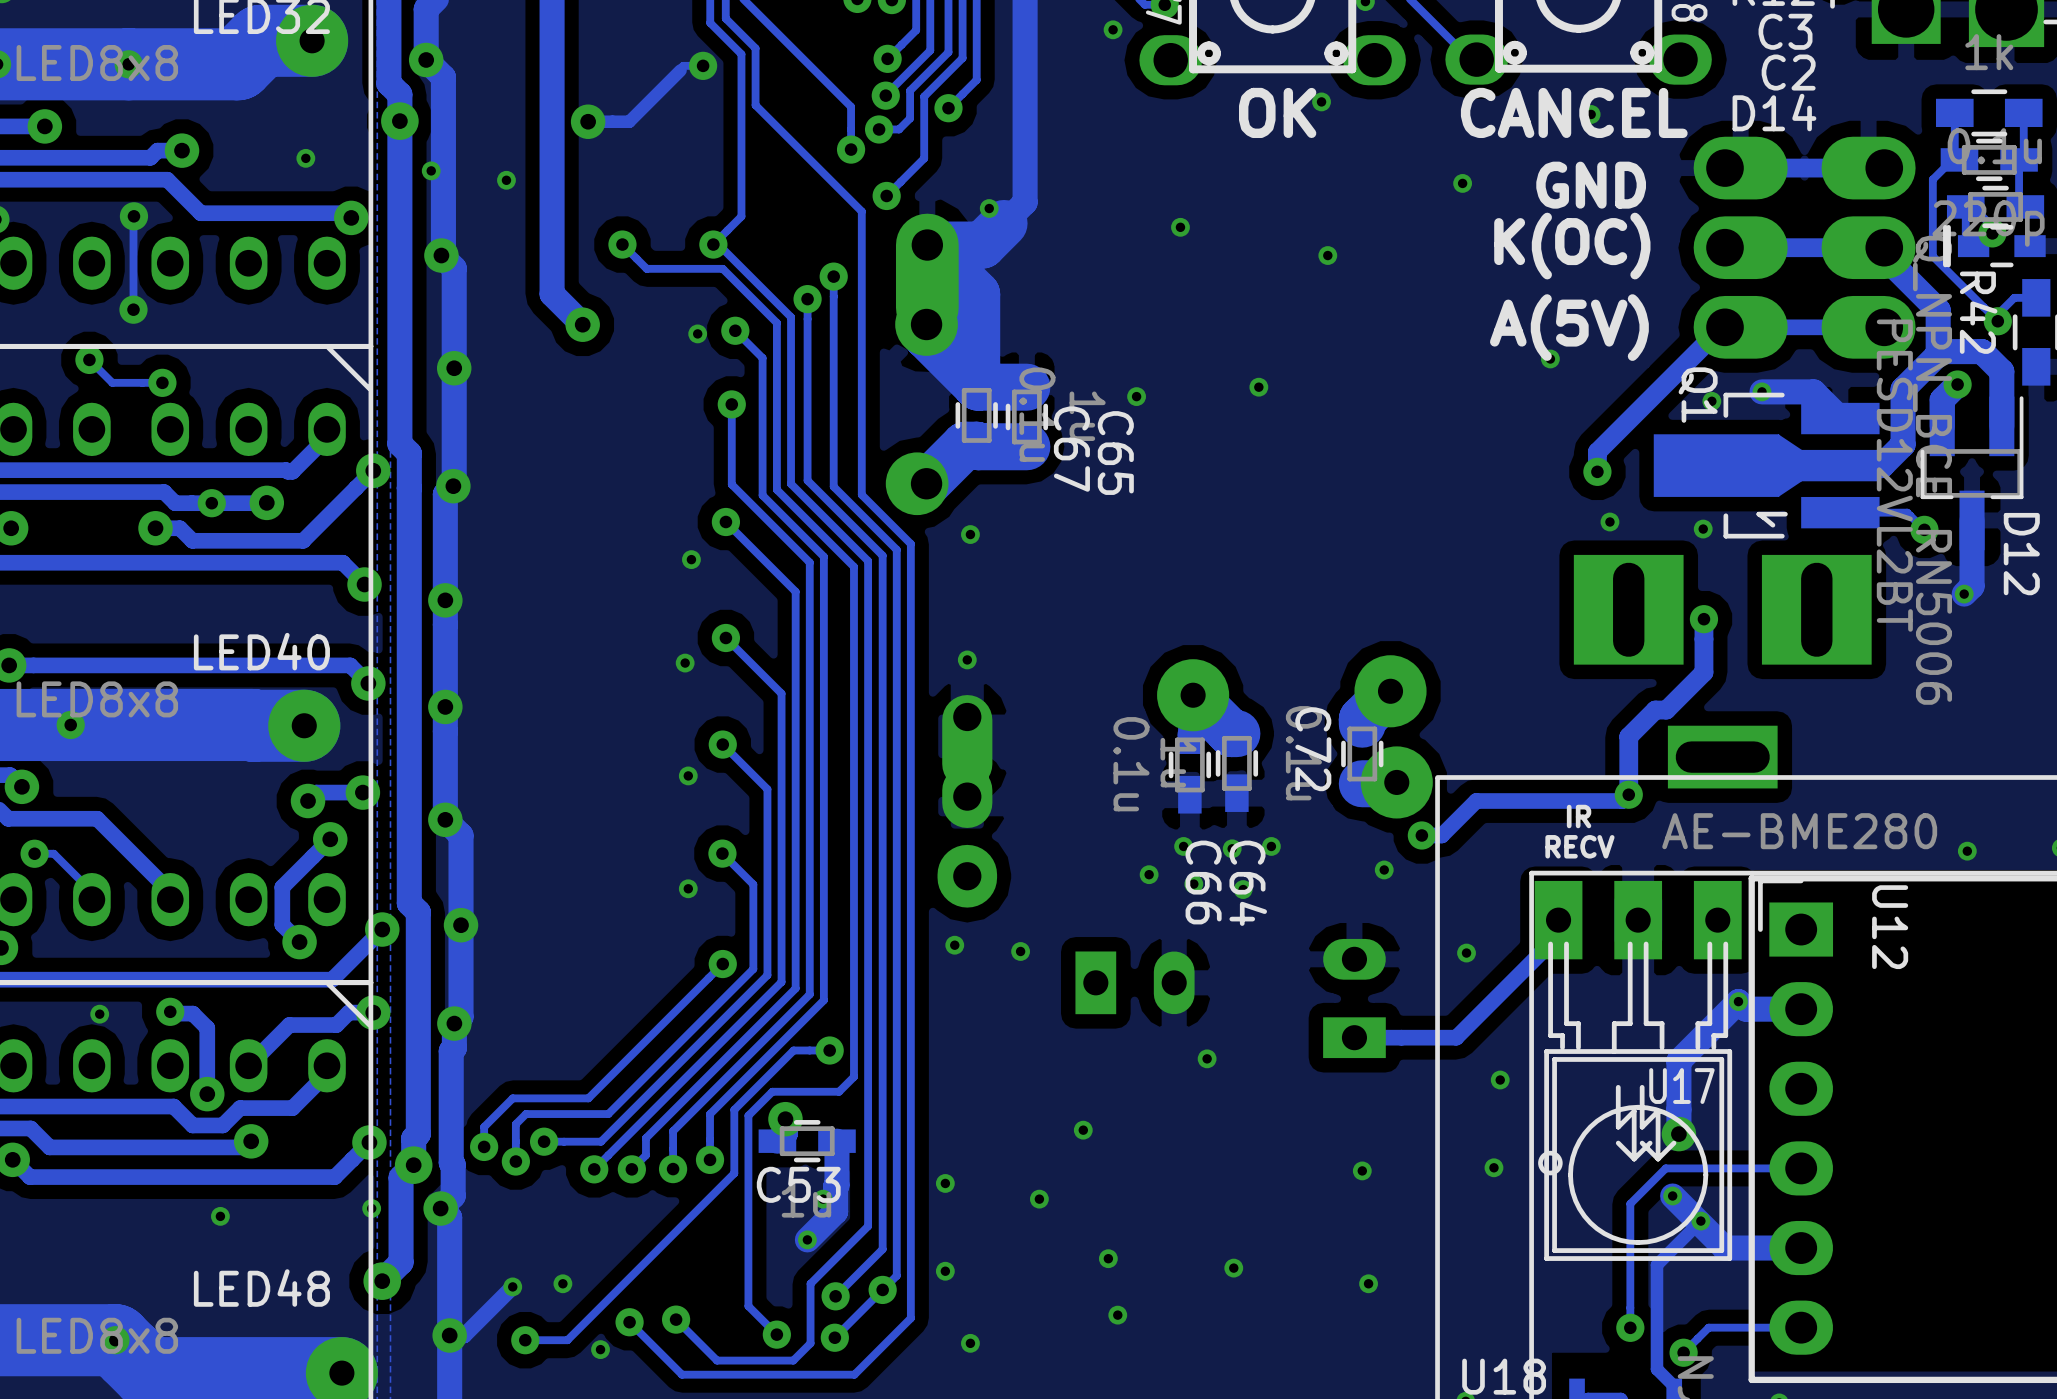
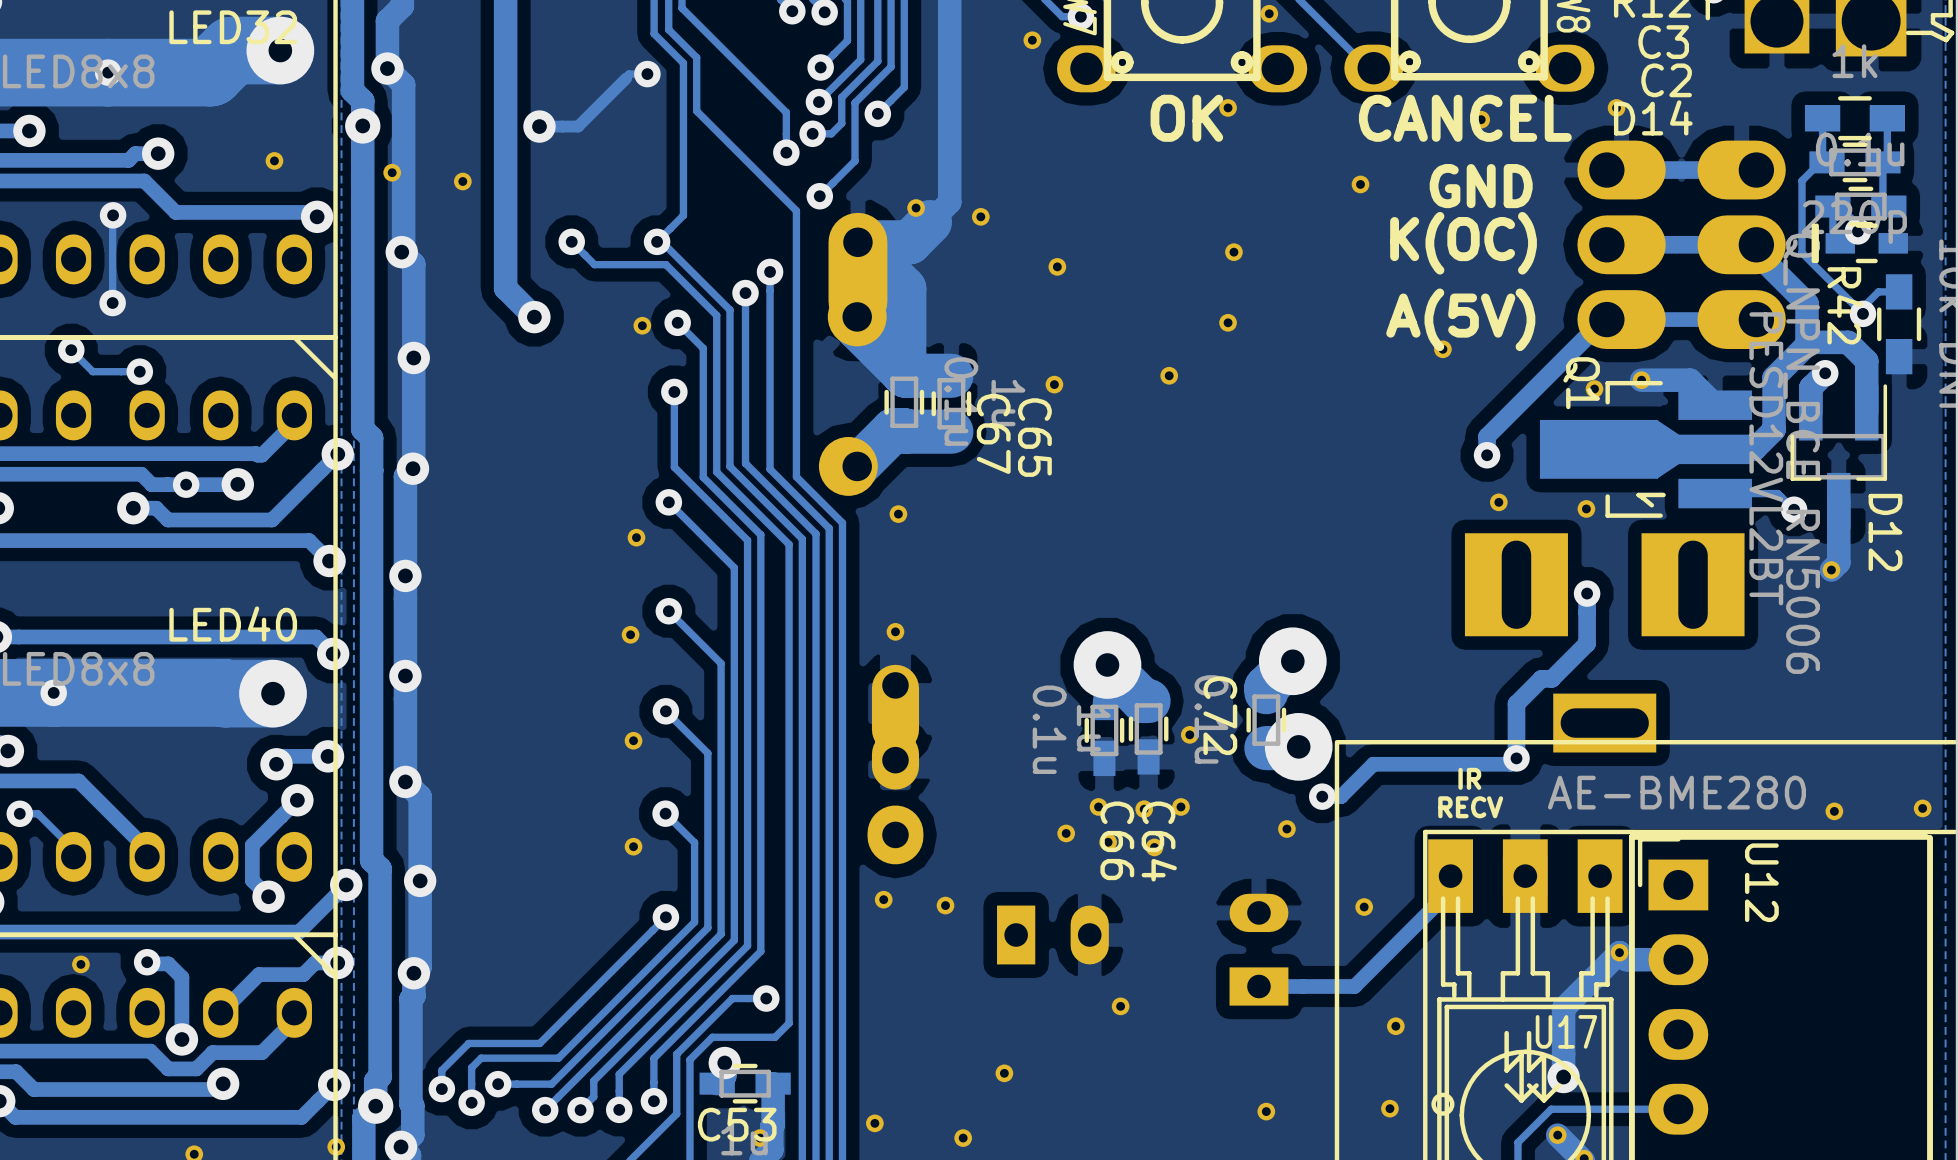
part: none -> (1616, 107)
part: none -> (980, 216)
part position: (1180, 227) -> (1057, 266)
part: none -> (1228, 322)
part: none -> (1189, 734)

